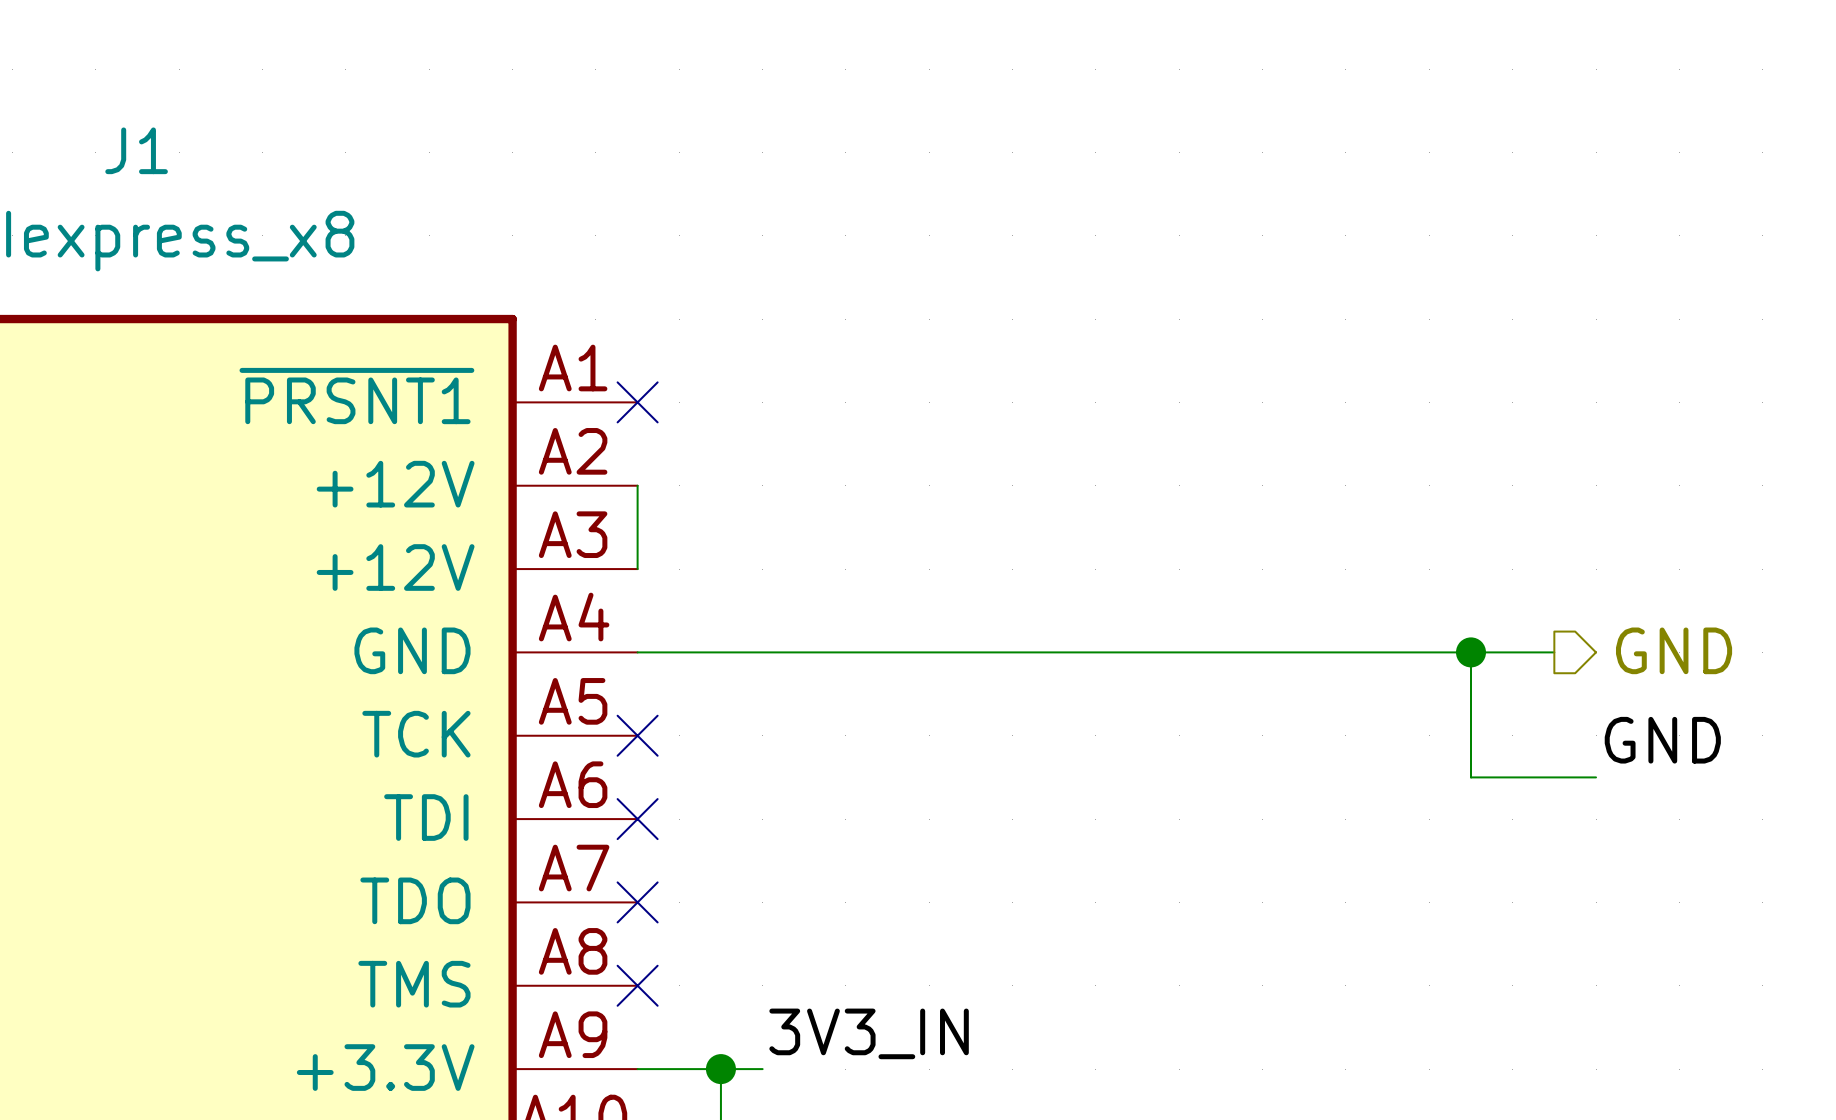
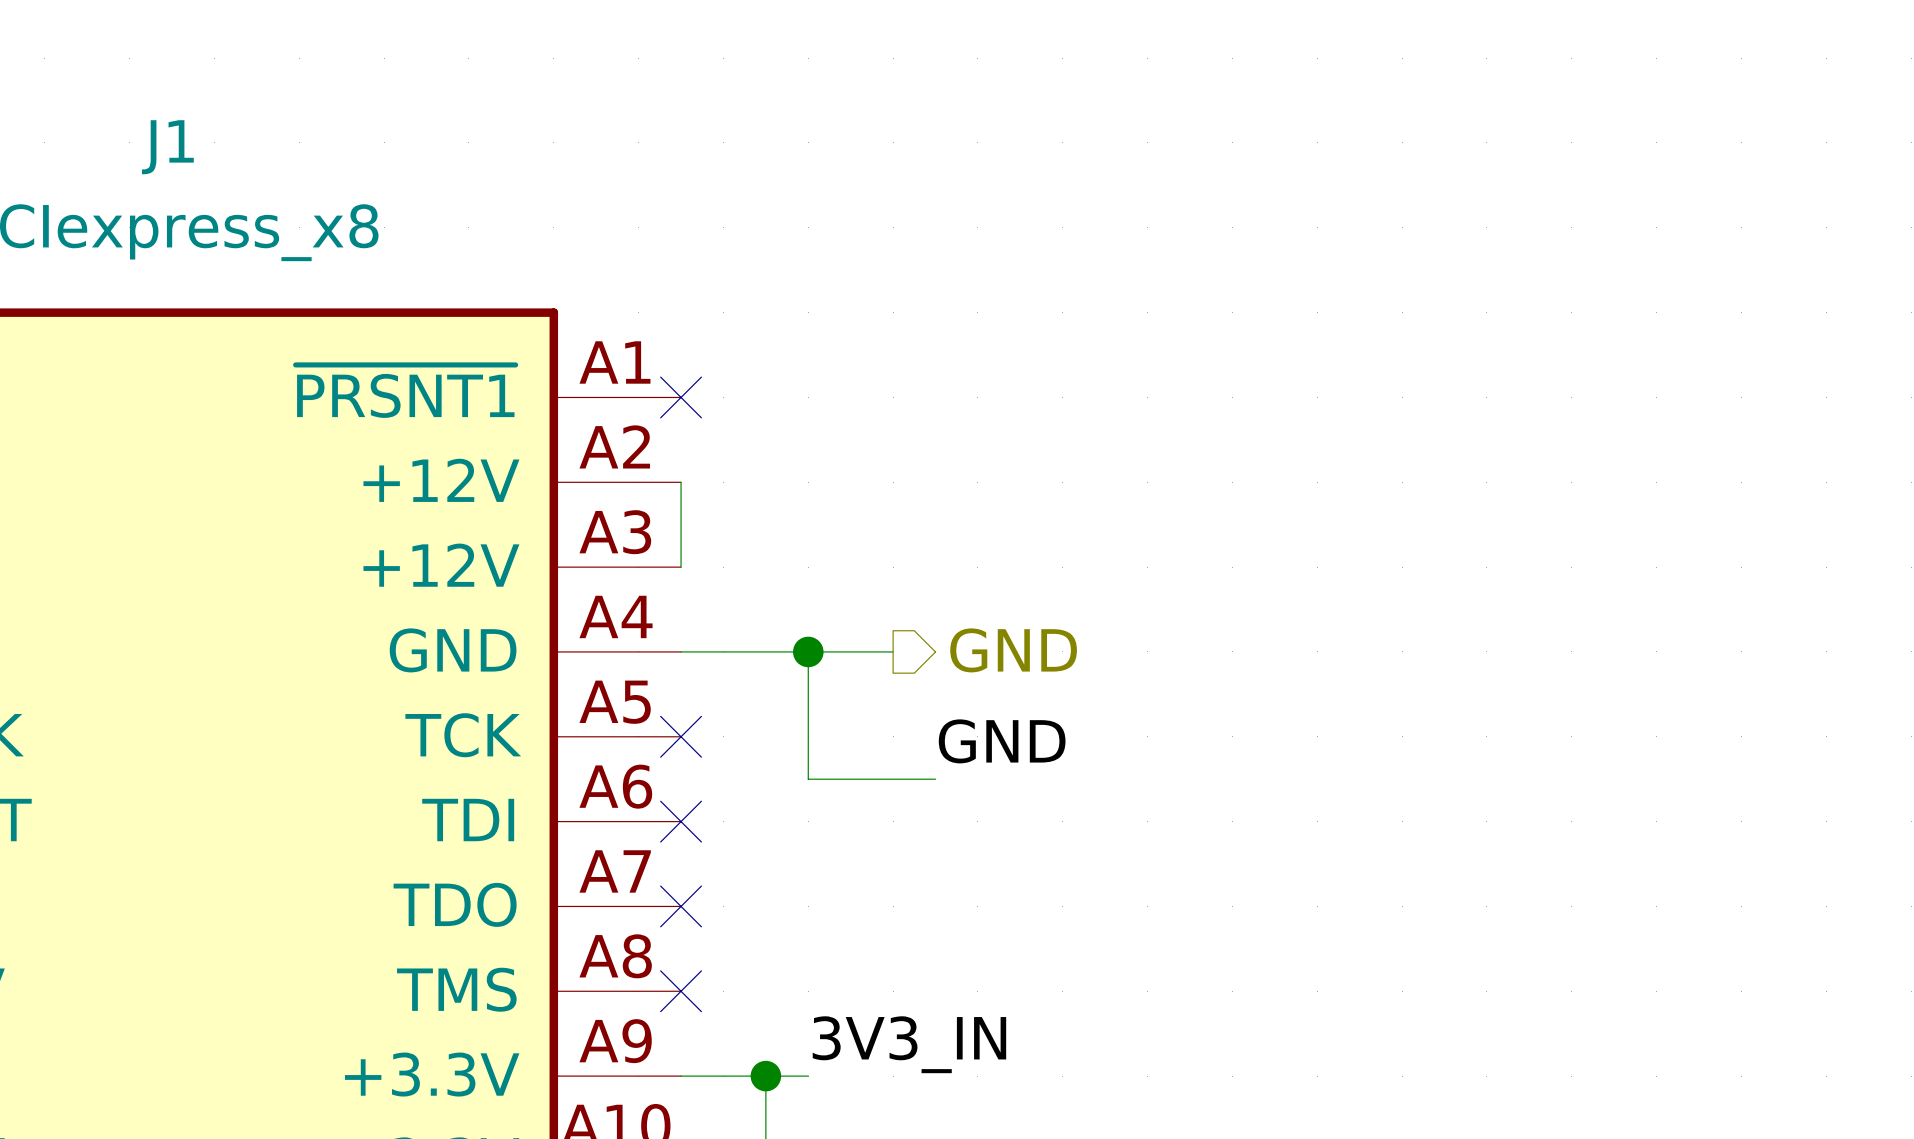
hierarchical label position: GND (1674, 650) -> GND (1013, 650)
junction: none -> (808, 651)
wire: (845, 652) (1554, 652) -> none
wire: (1471, 652) (1471, 777) (1596, 777) -> (808, 651) (808, 779) (935, 779)
junction: (1471, 652) -> none
label position: GND (1662, 740) -> GND (1002, 741)

